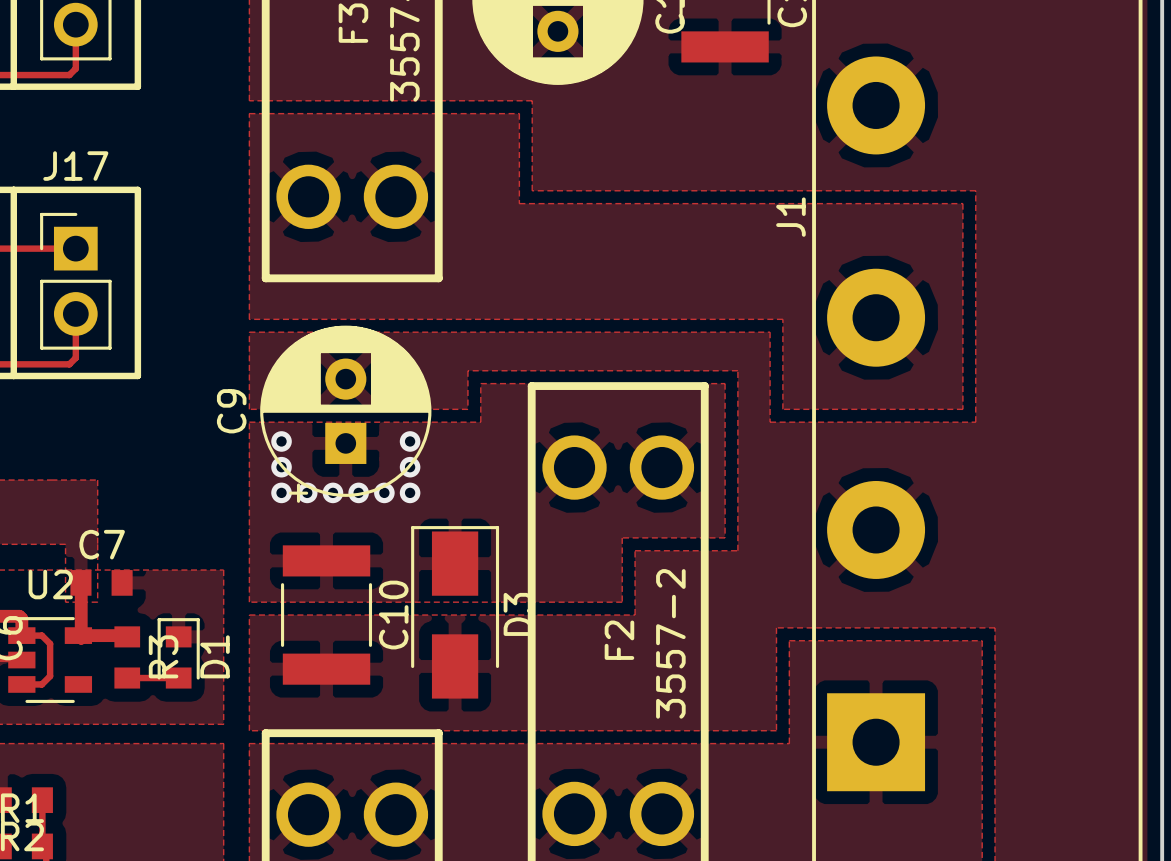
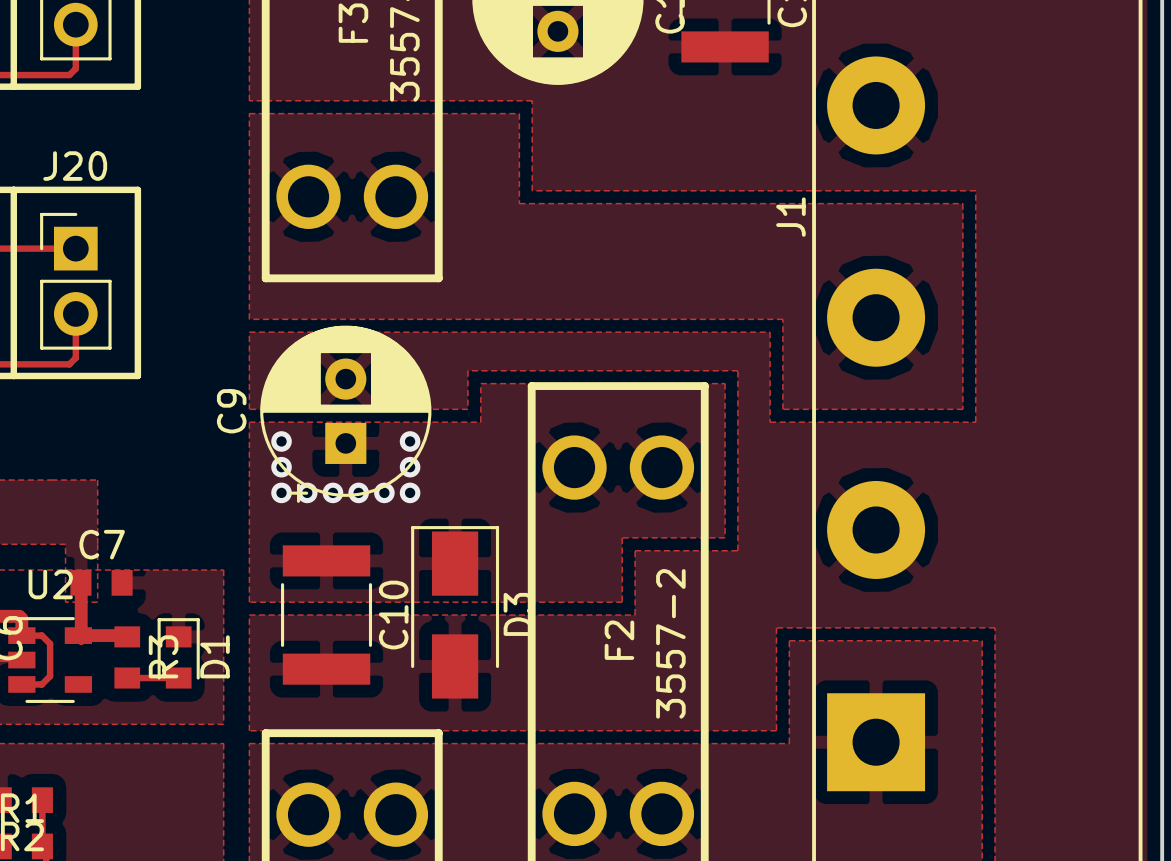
J17 name: J17 (75, 166) -> J20 (75, 166)

